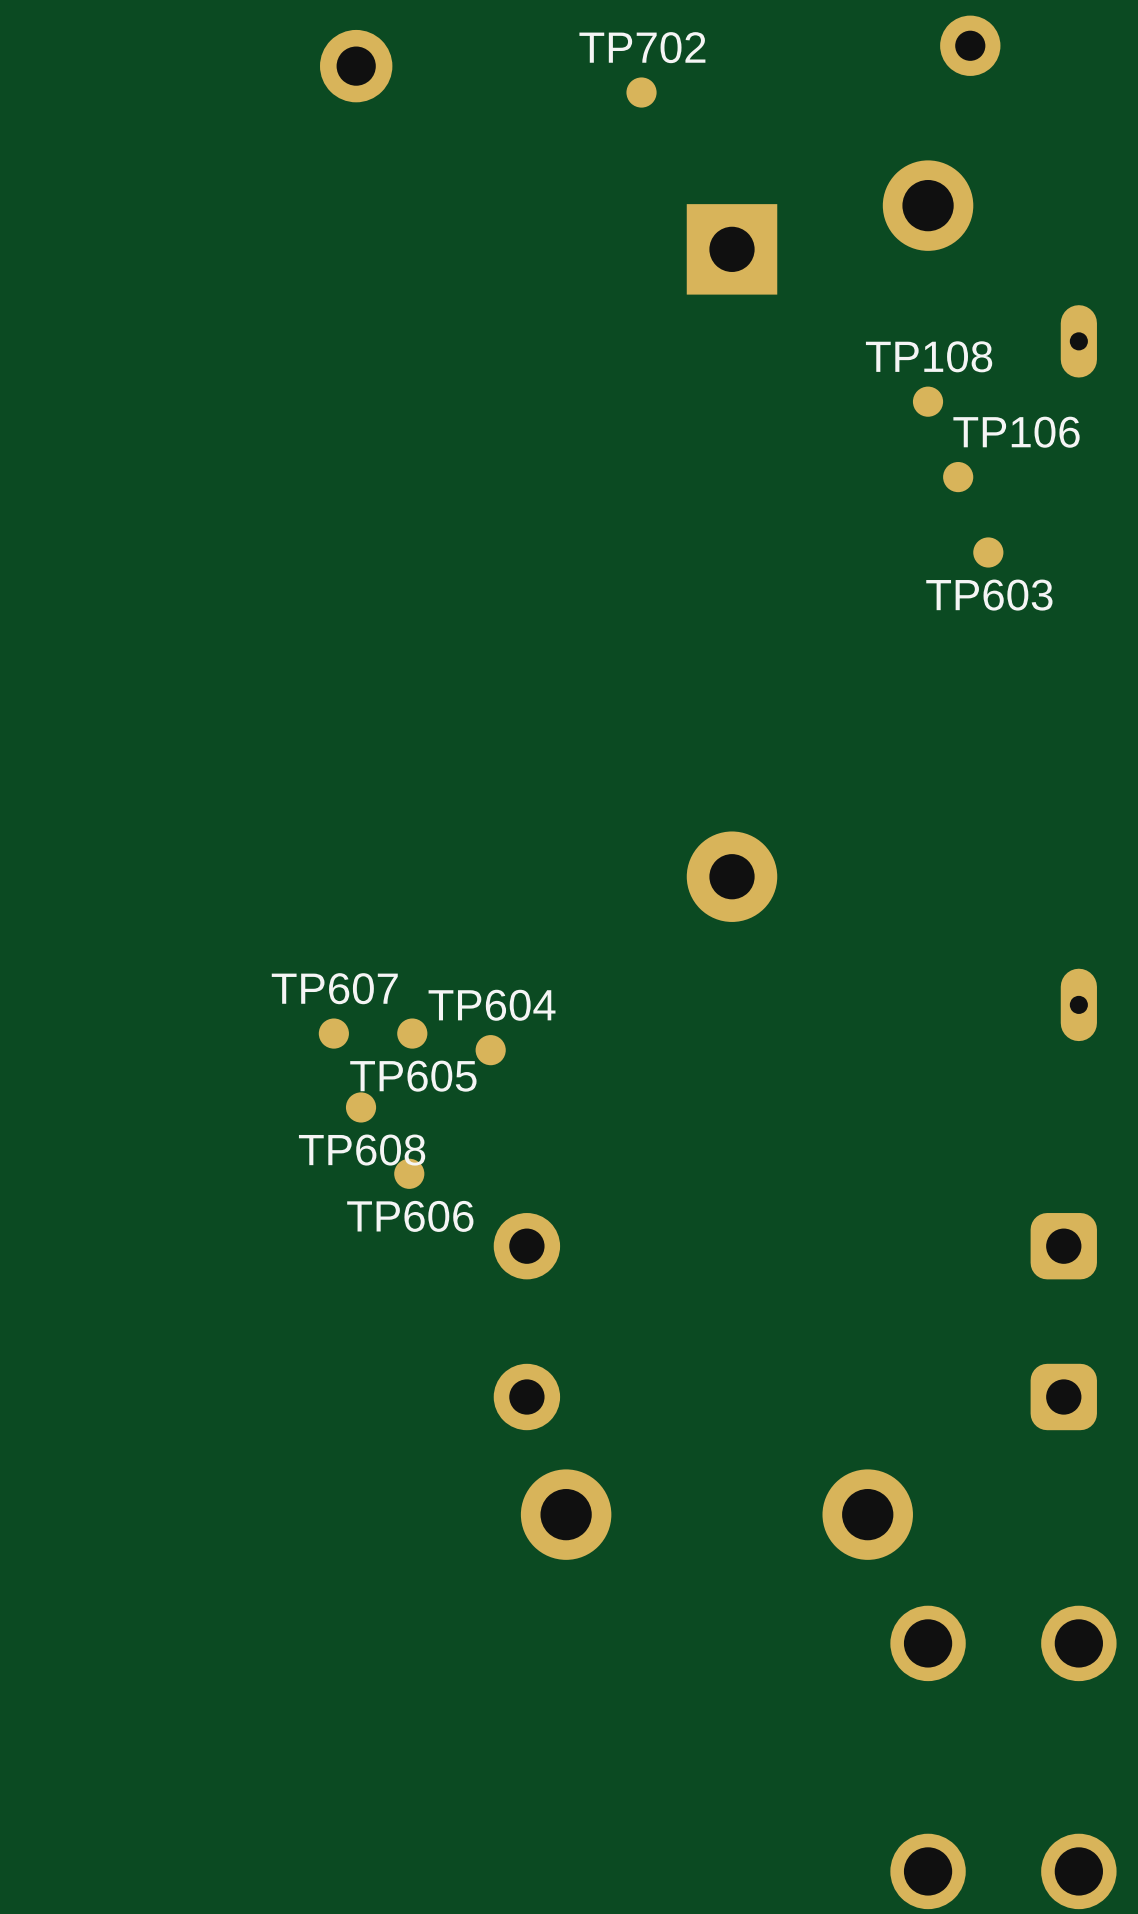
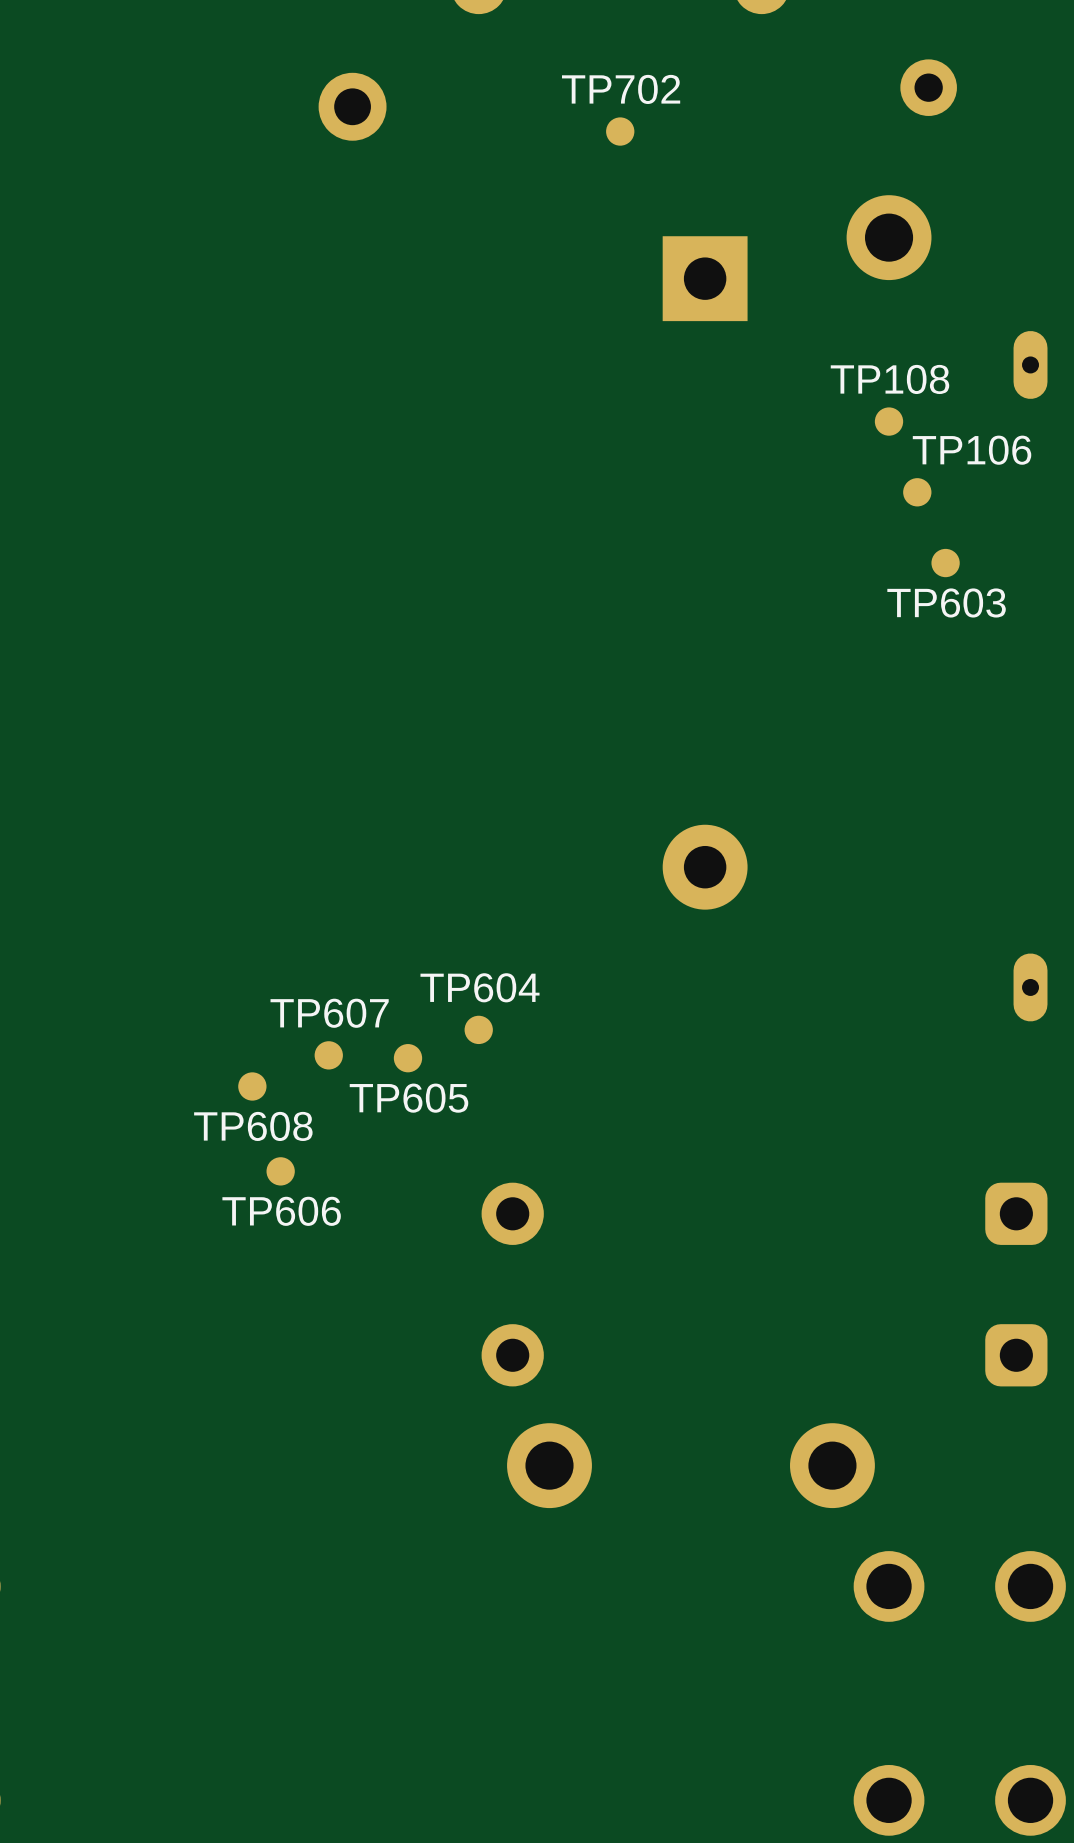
TP607 position: (333, 1033) -> (328, 1055)
TP605 position: (412, 1033) -> (407, 1058)
TP608 position: (361, 1107) -> (252, 1086)
TP606 position: (409, 1173) -> (280, 1171)

